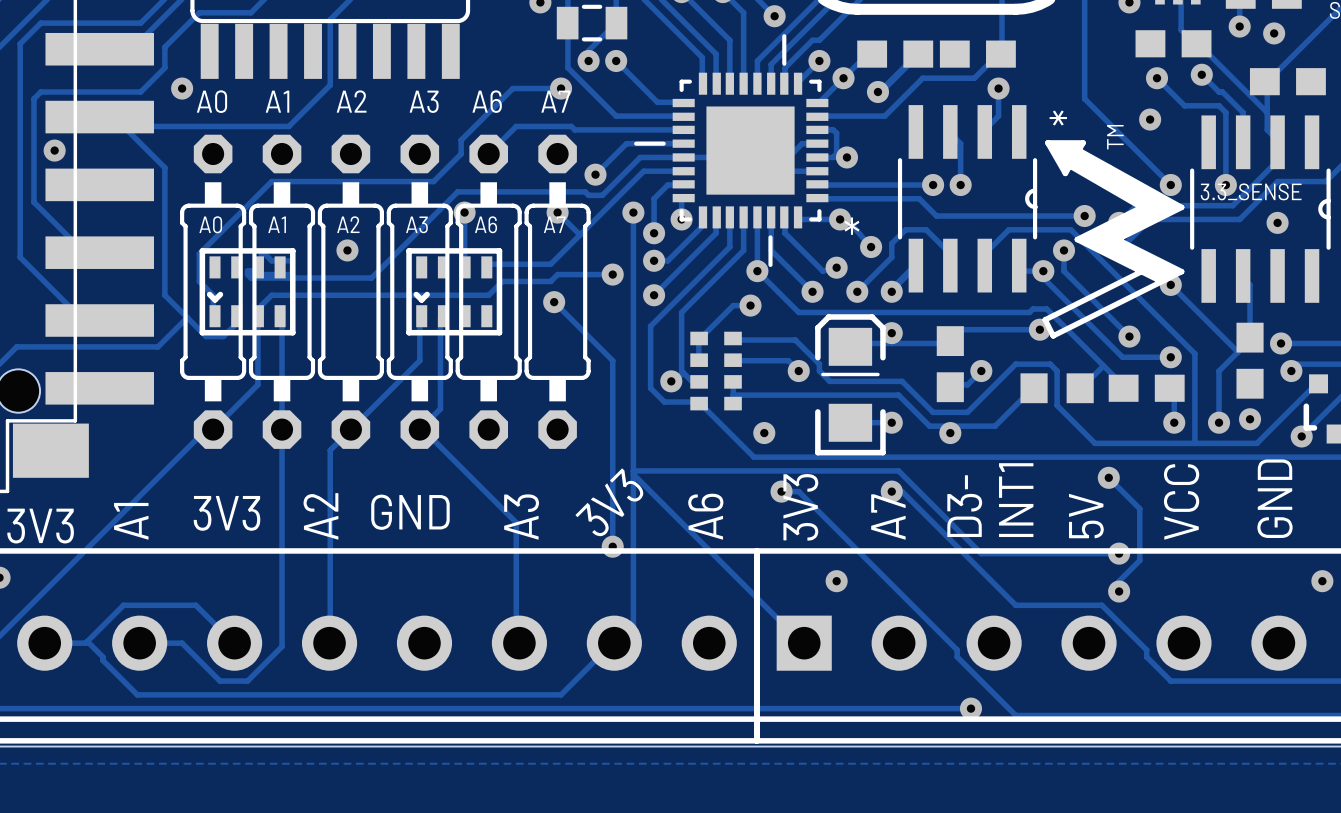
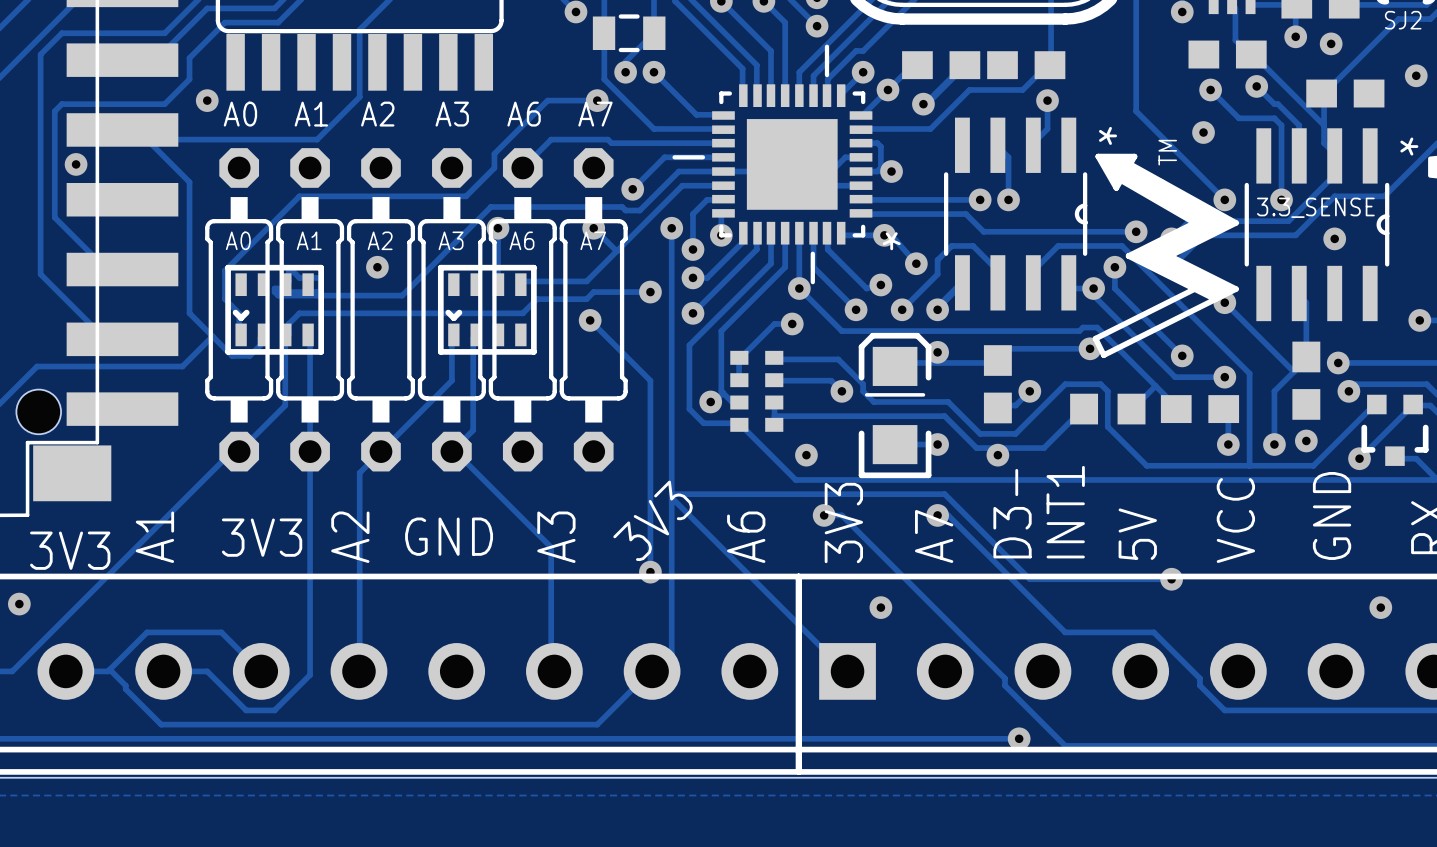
track: (1108, 477) (1139, 508) (1139, 560) (1119, 581) (1119, 591) -> none
via: (1108, 477) -> none
via: (1119, 591) -> none

